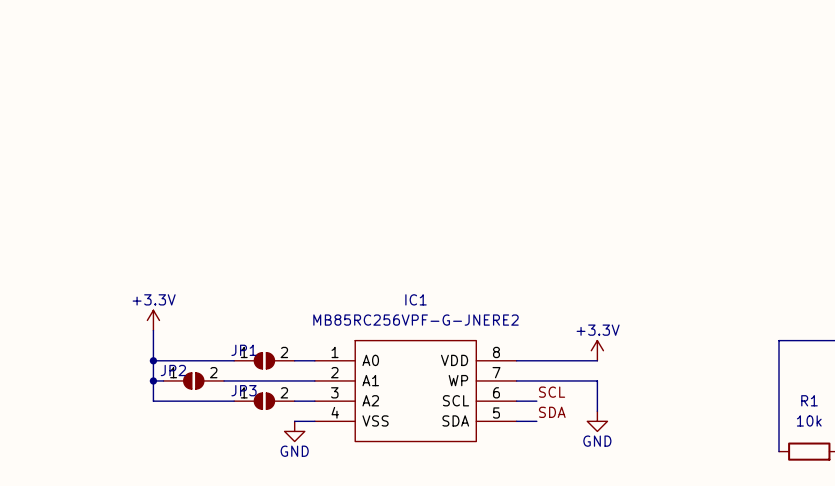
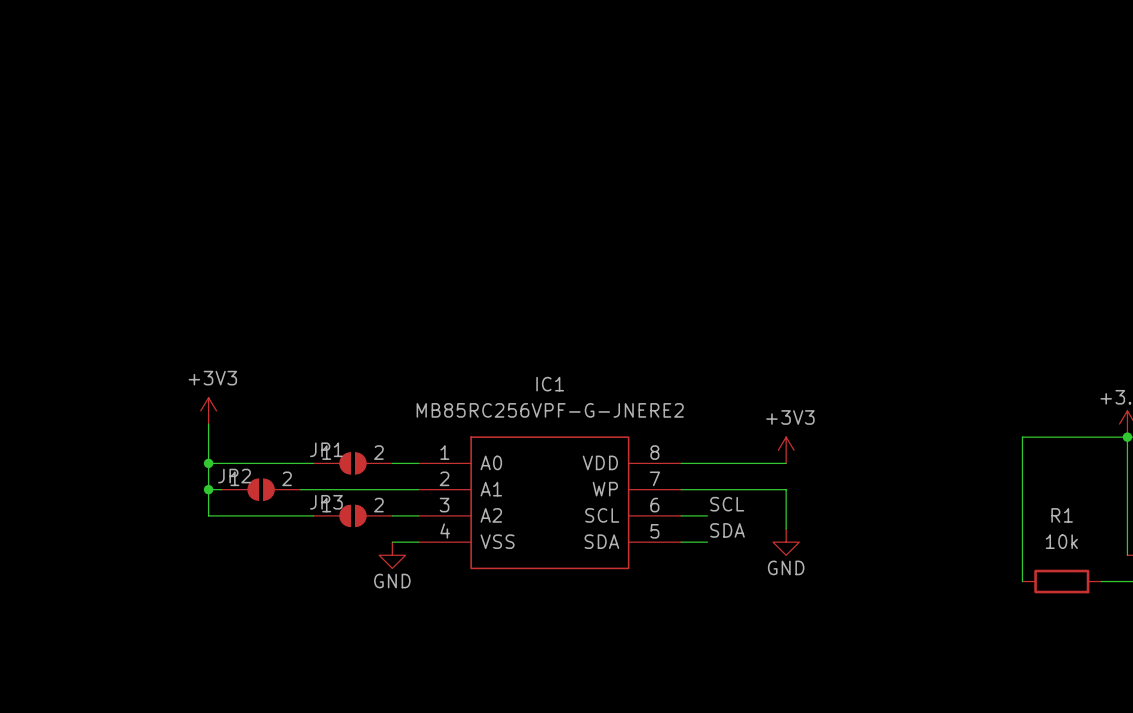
power symbol: +3.3V (153, 320) -> +3V3 (208, 410)
power symbol: +3.3V (597, 350) -> +3V3 (786, 450)

